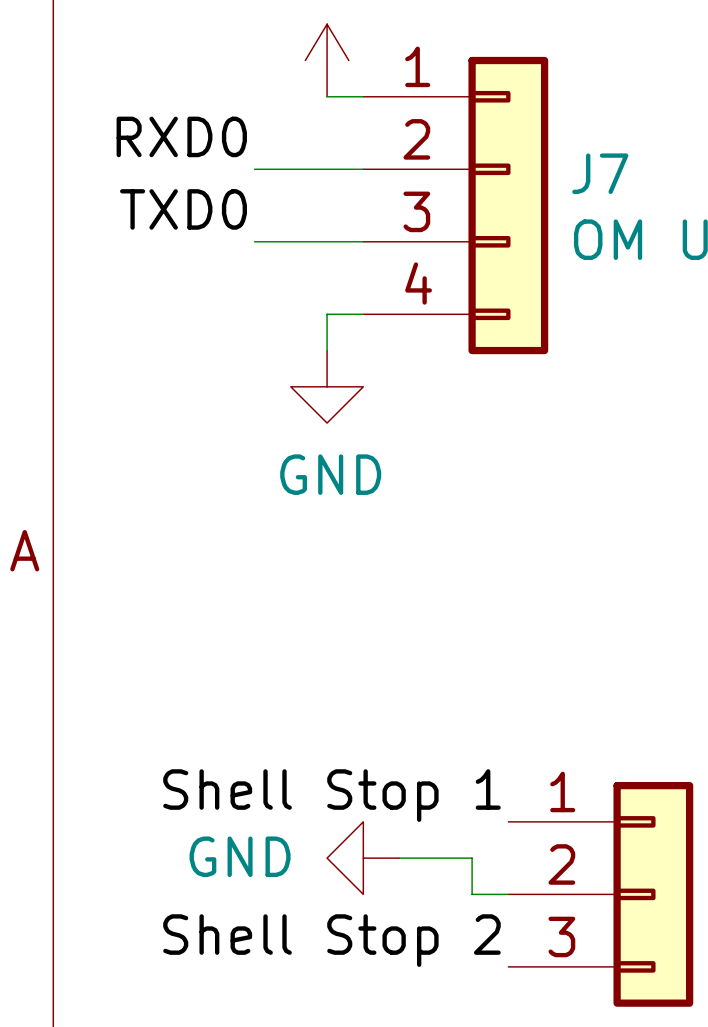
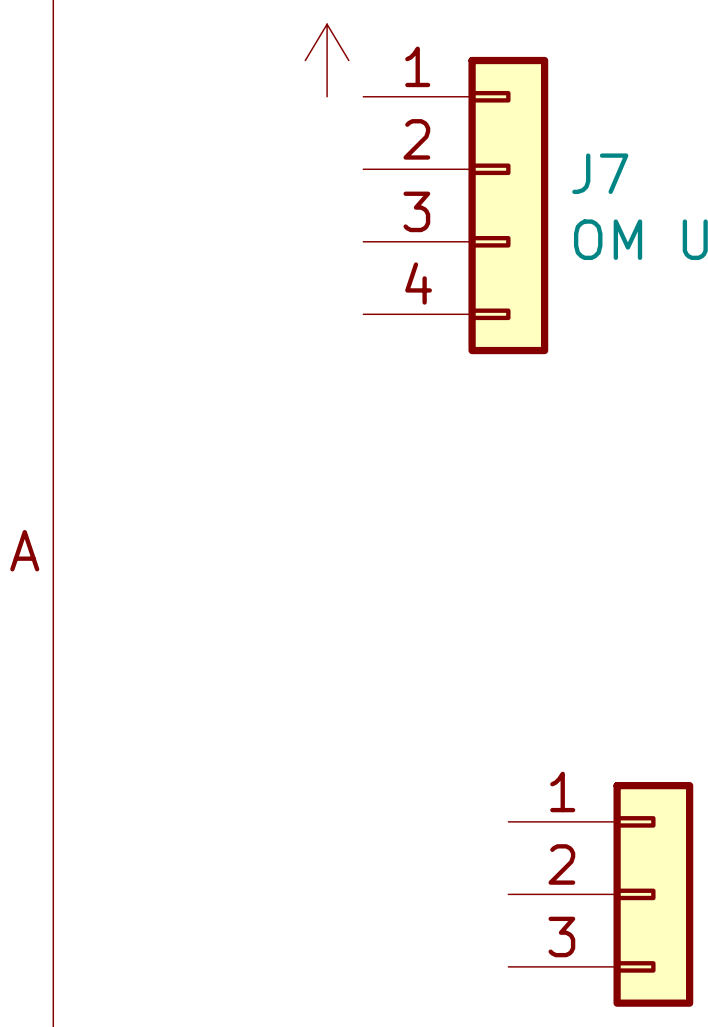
wire: (327, 96) (363, 96) -> none
label: RXD0 (181, 136) -> none
wire: (254, 169) (363, 169) -> none
label: TXD0 (183, 209) -> none
wire: (254, 241) (363, 241) -> none
wire: (363, 314) (327, 314) (327, 350) -> none
power symbol: GND (327, 386) -> none
label: Shell Stop 1 (331, 795) -> none
power symbol: GND (363, 858) -> none
wire: (399, 858) (472, 858) (472, 894) (508, 894) -> none
label: Shell Stop 2 (331, 940) -> none

